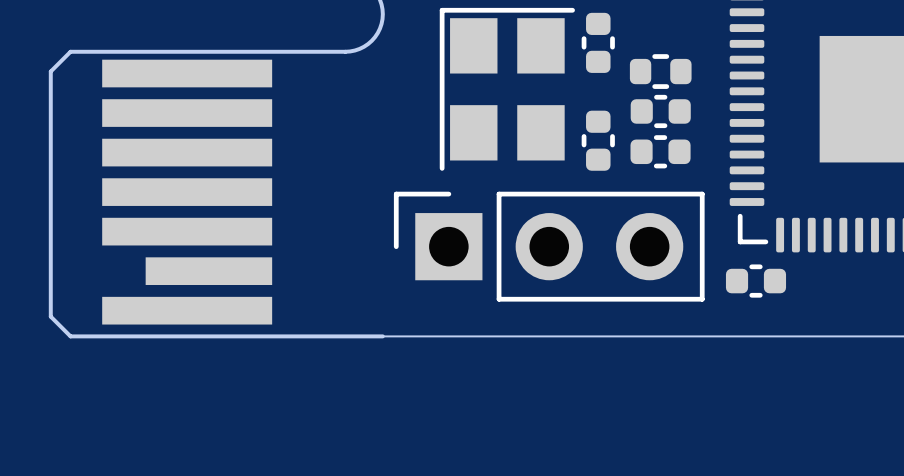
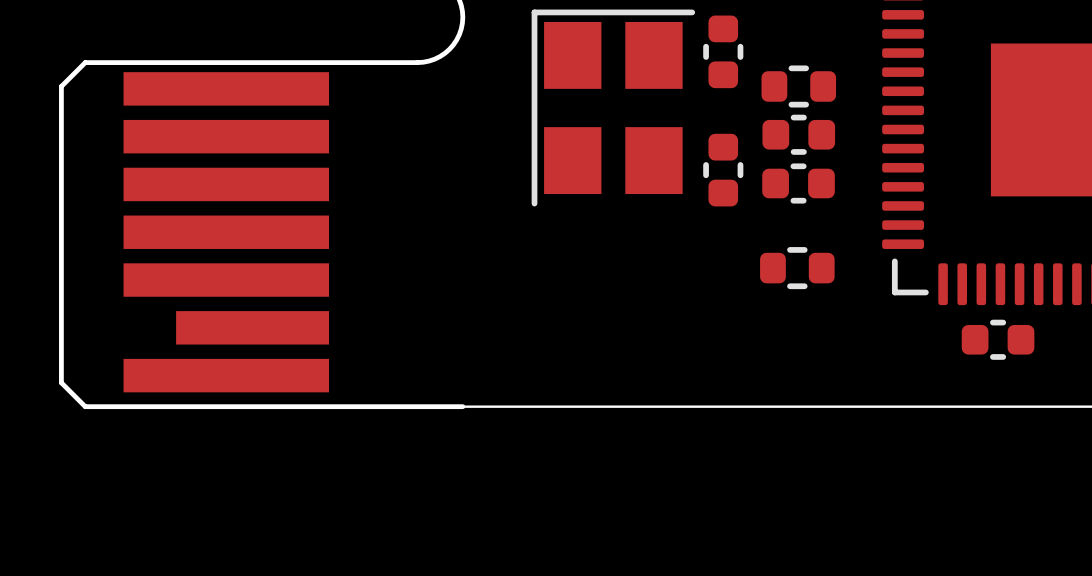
part: none -> (797, 268)
part: (549, 246) -> none
part position: (756, 281) -> (998, 339)

